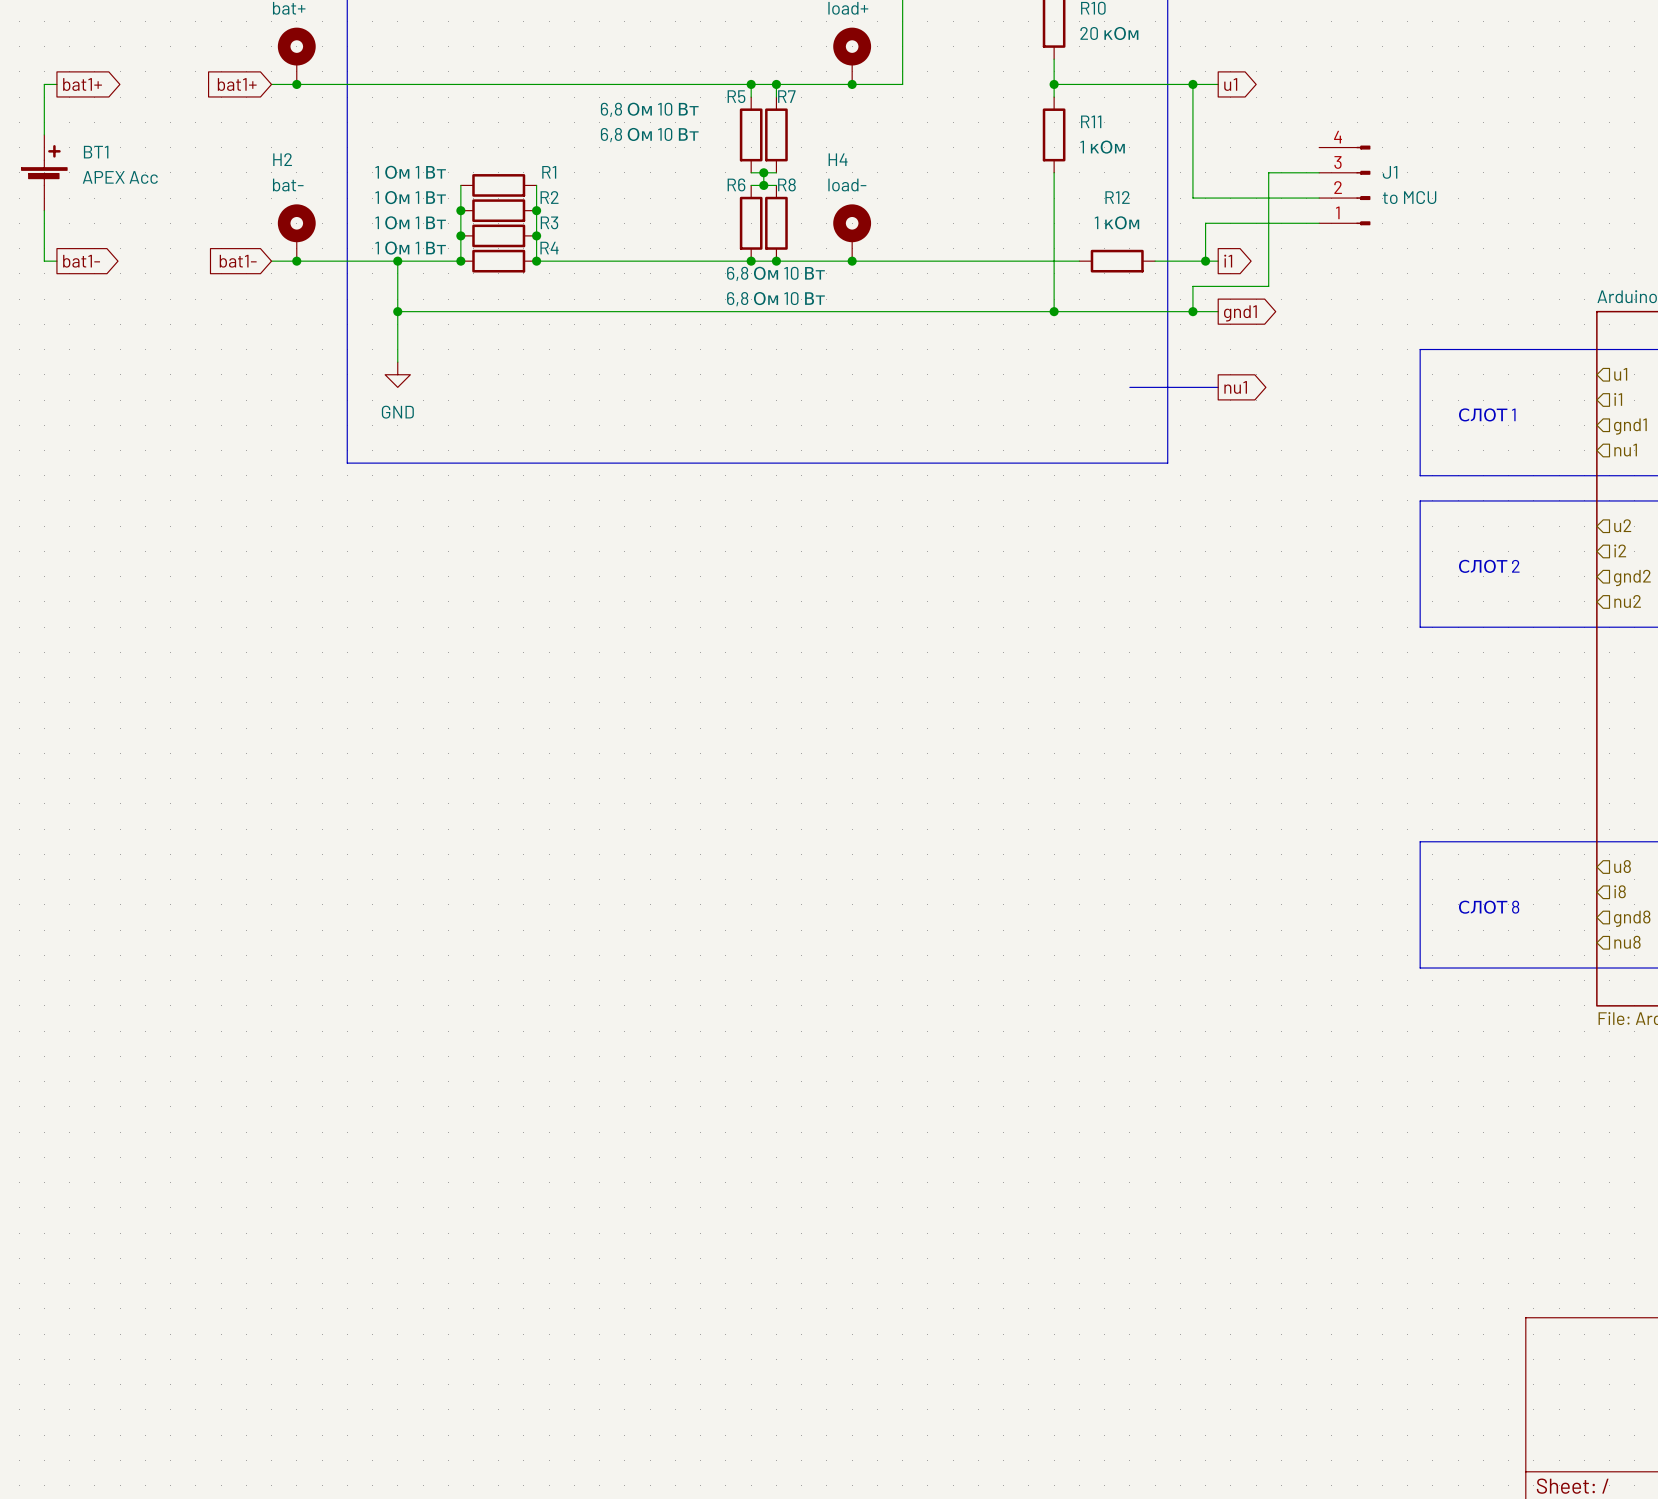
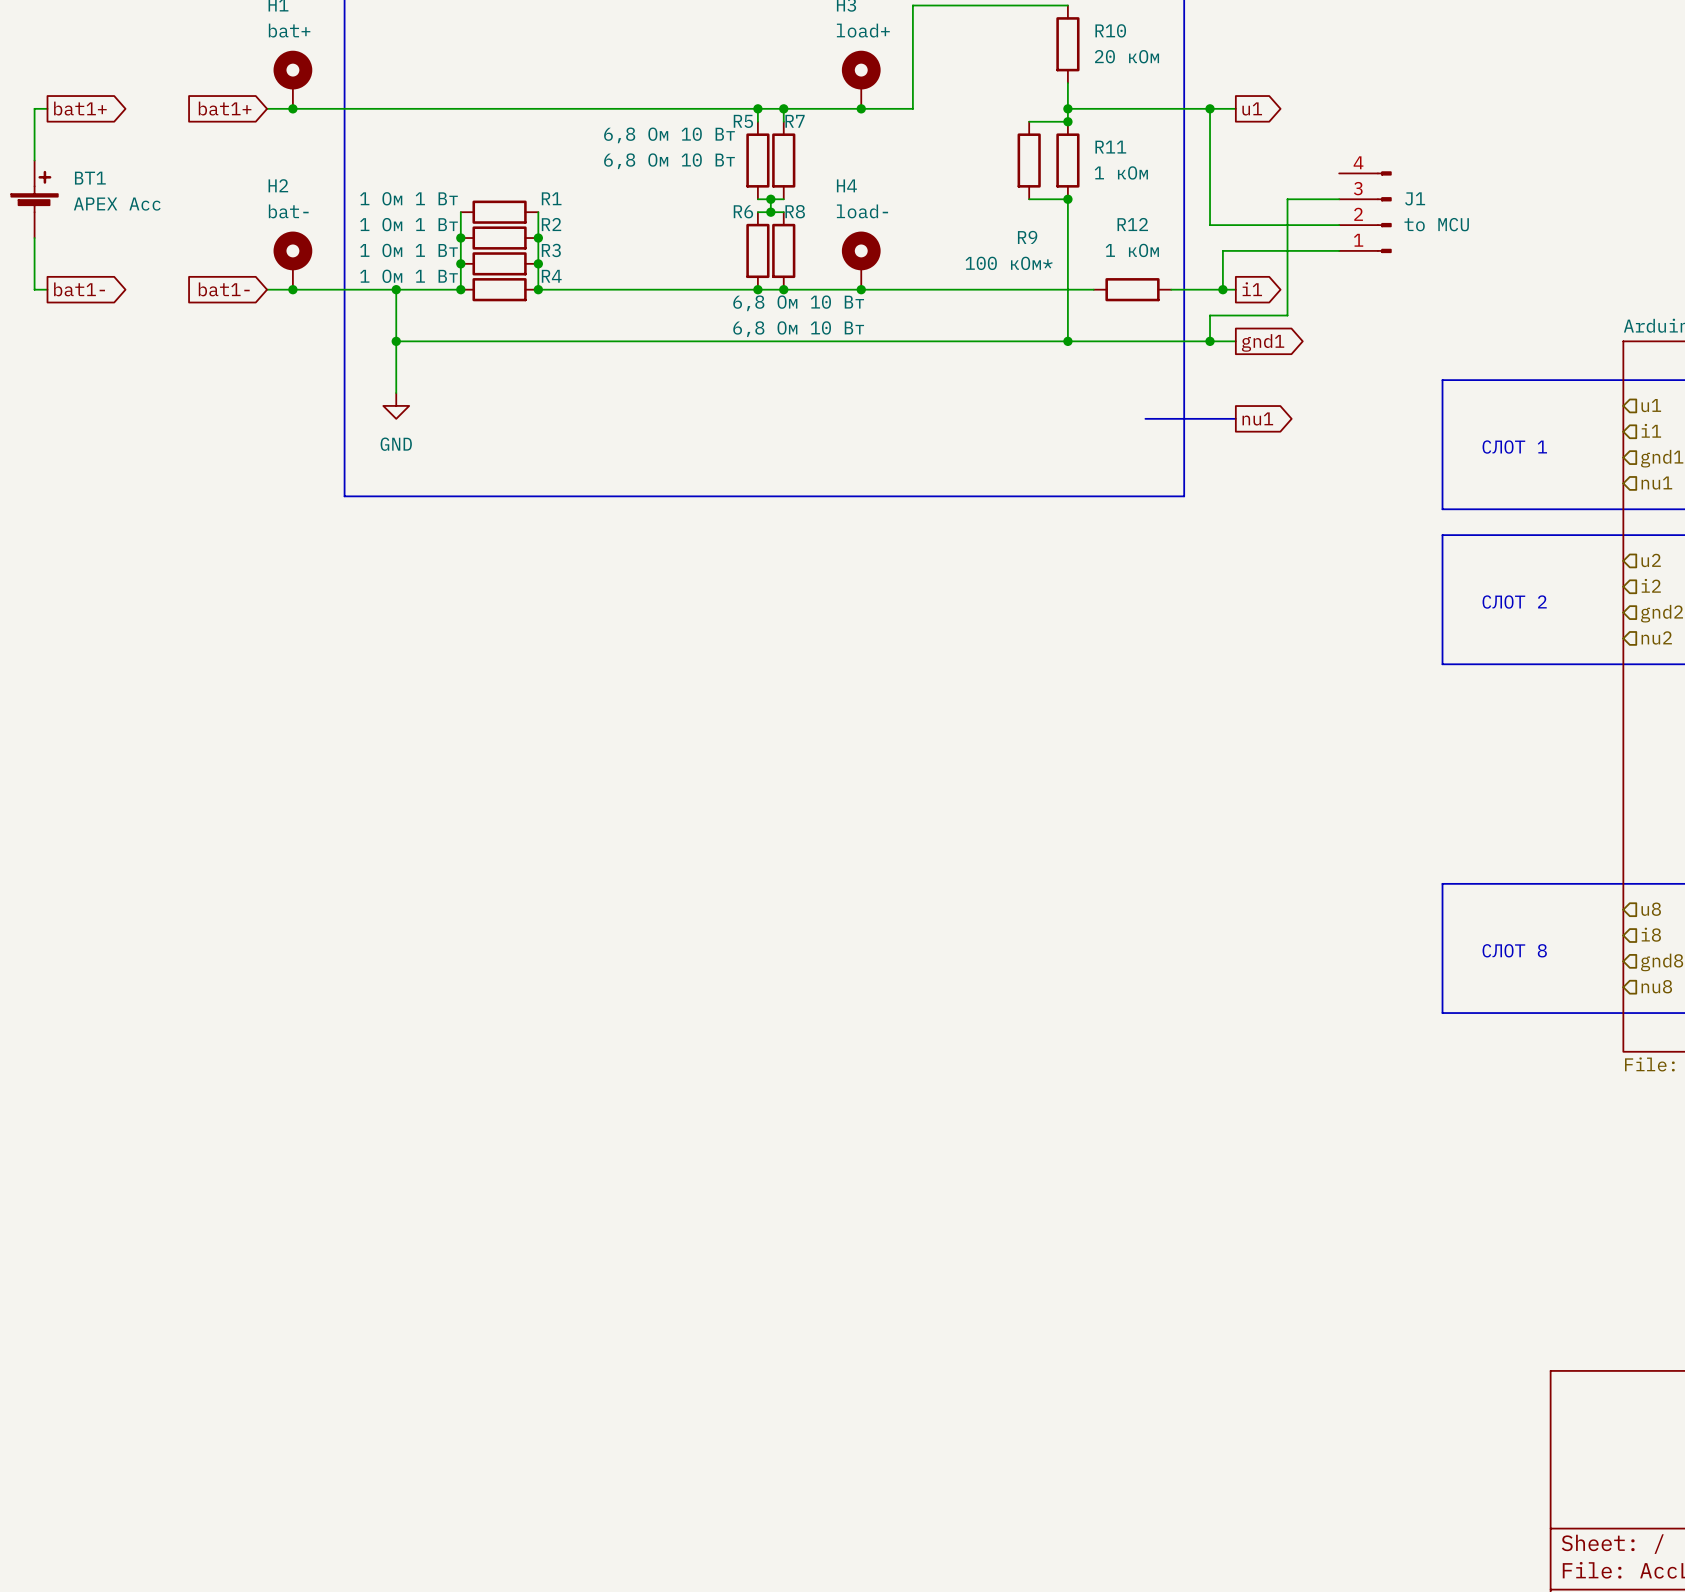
wire: none -> (1029, 121) (1067, 121)
junction: none -> (1067, 121)
R9: none -> 100 кОм* (1029, 160)
wire: none -> (1029, 199) (1067, 199)
junction: none -> (1067, 199)

